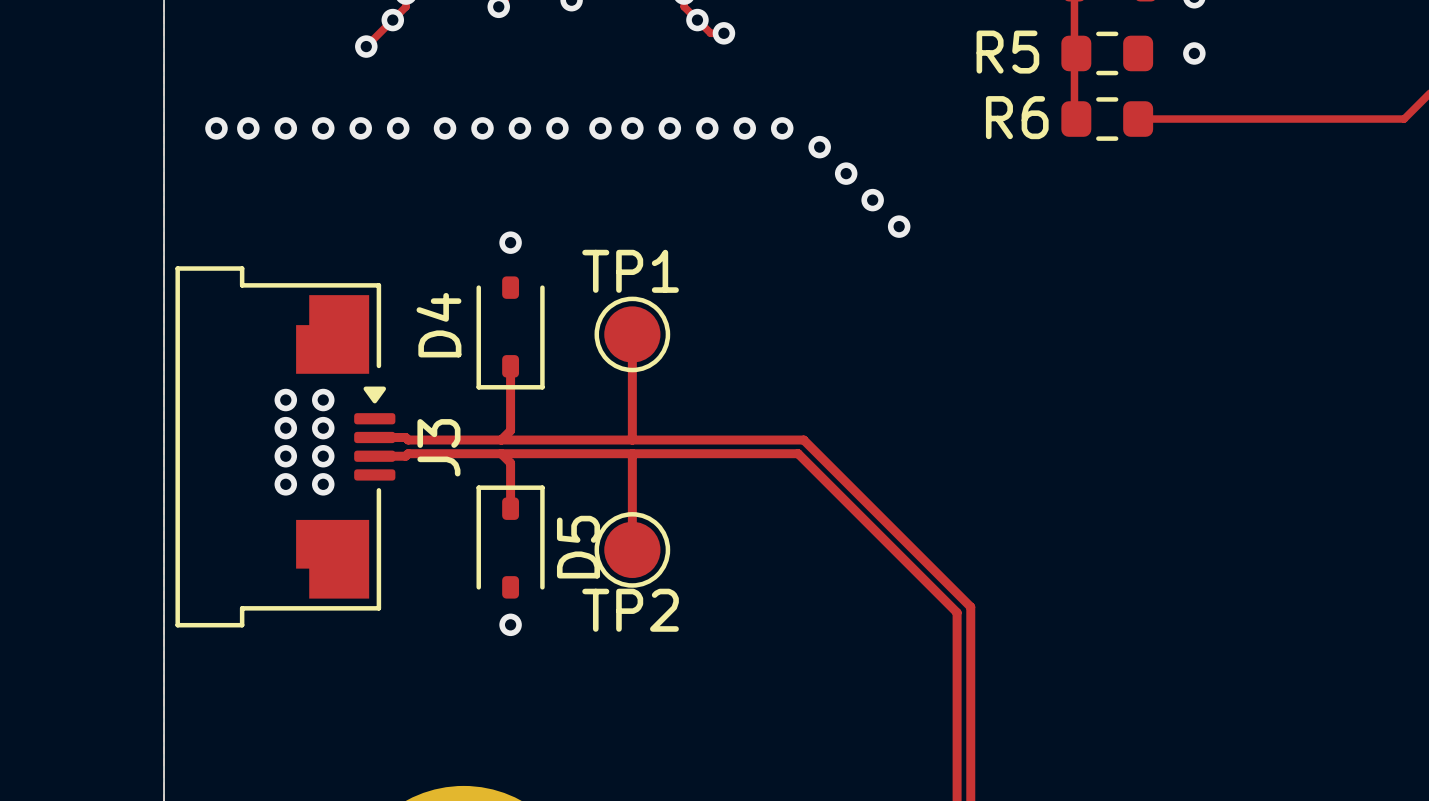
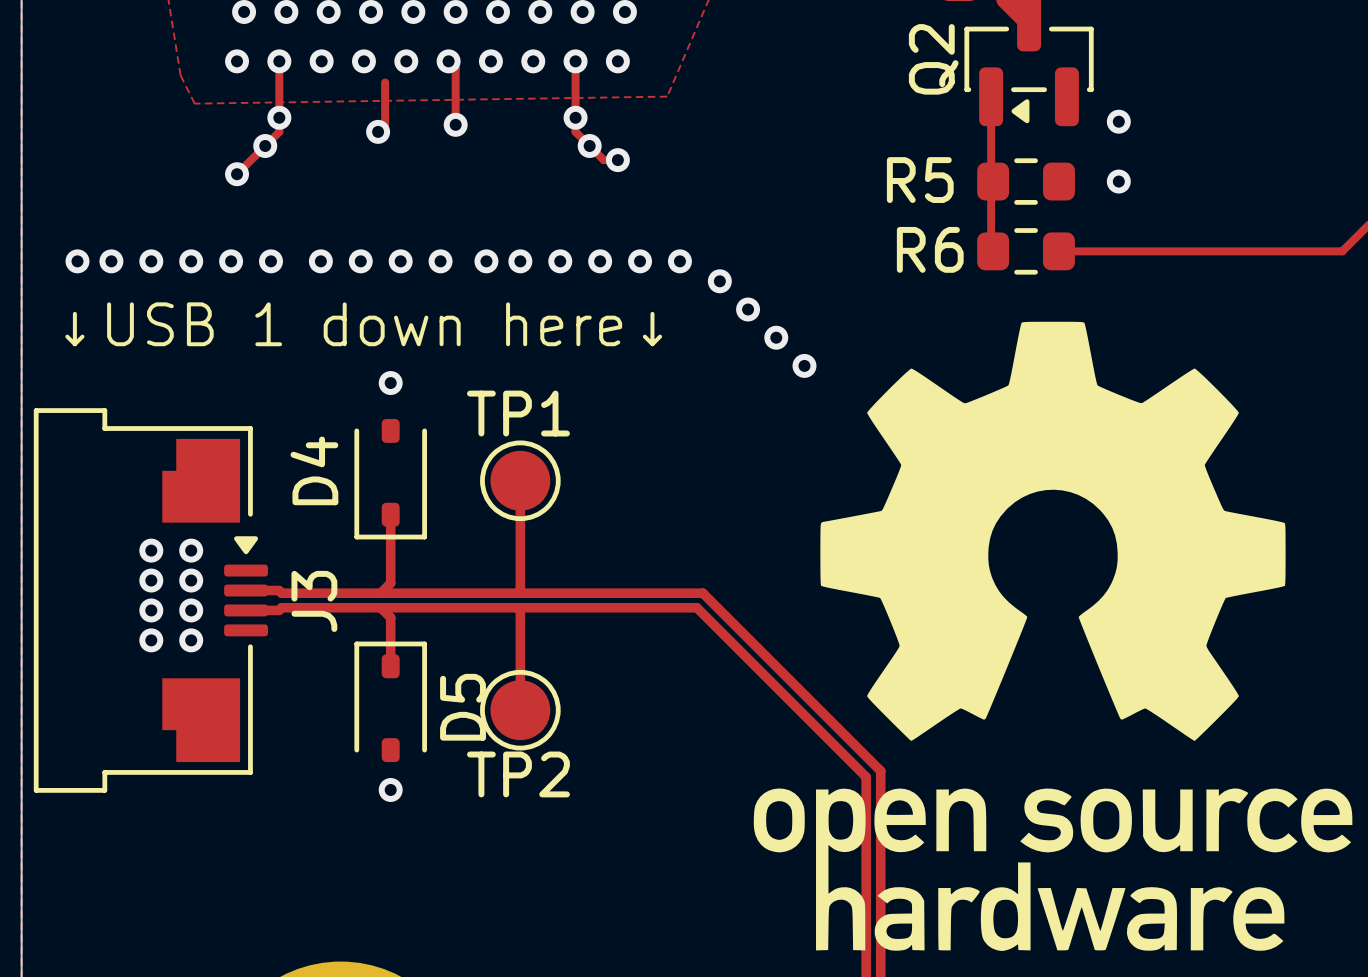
drawing: none -> [753, 321, 1353, 951]
text: none -> ↓USB 1 down here↓ (363, 324)

